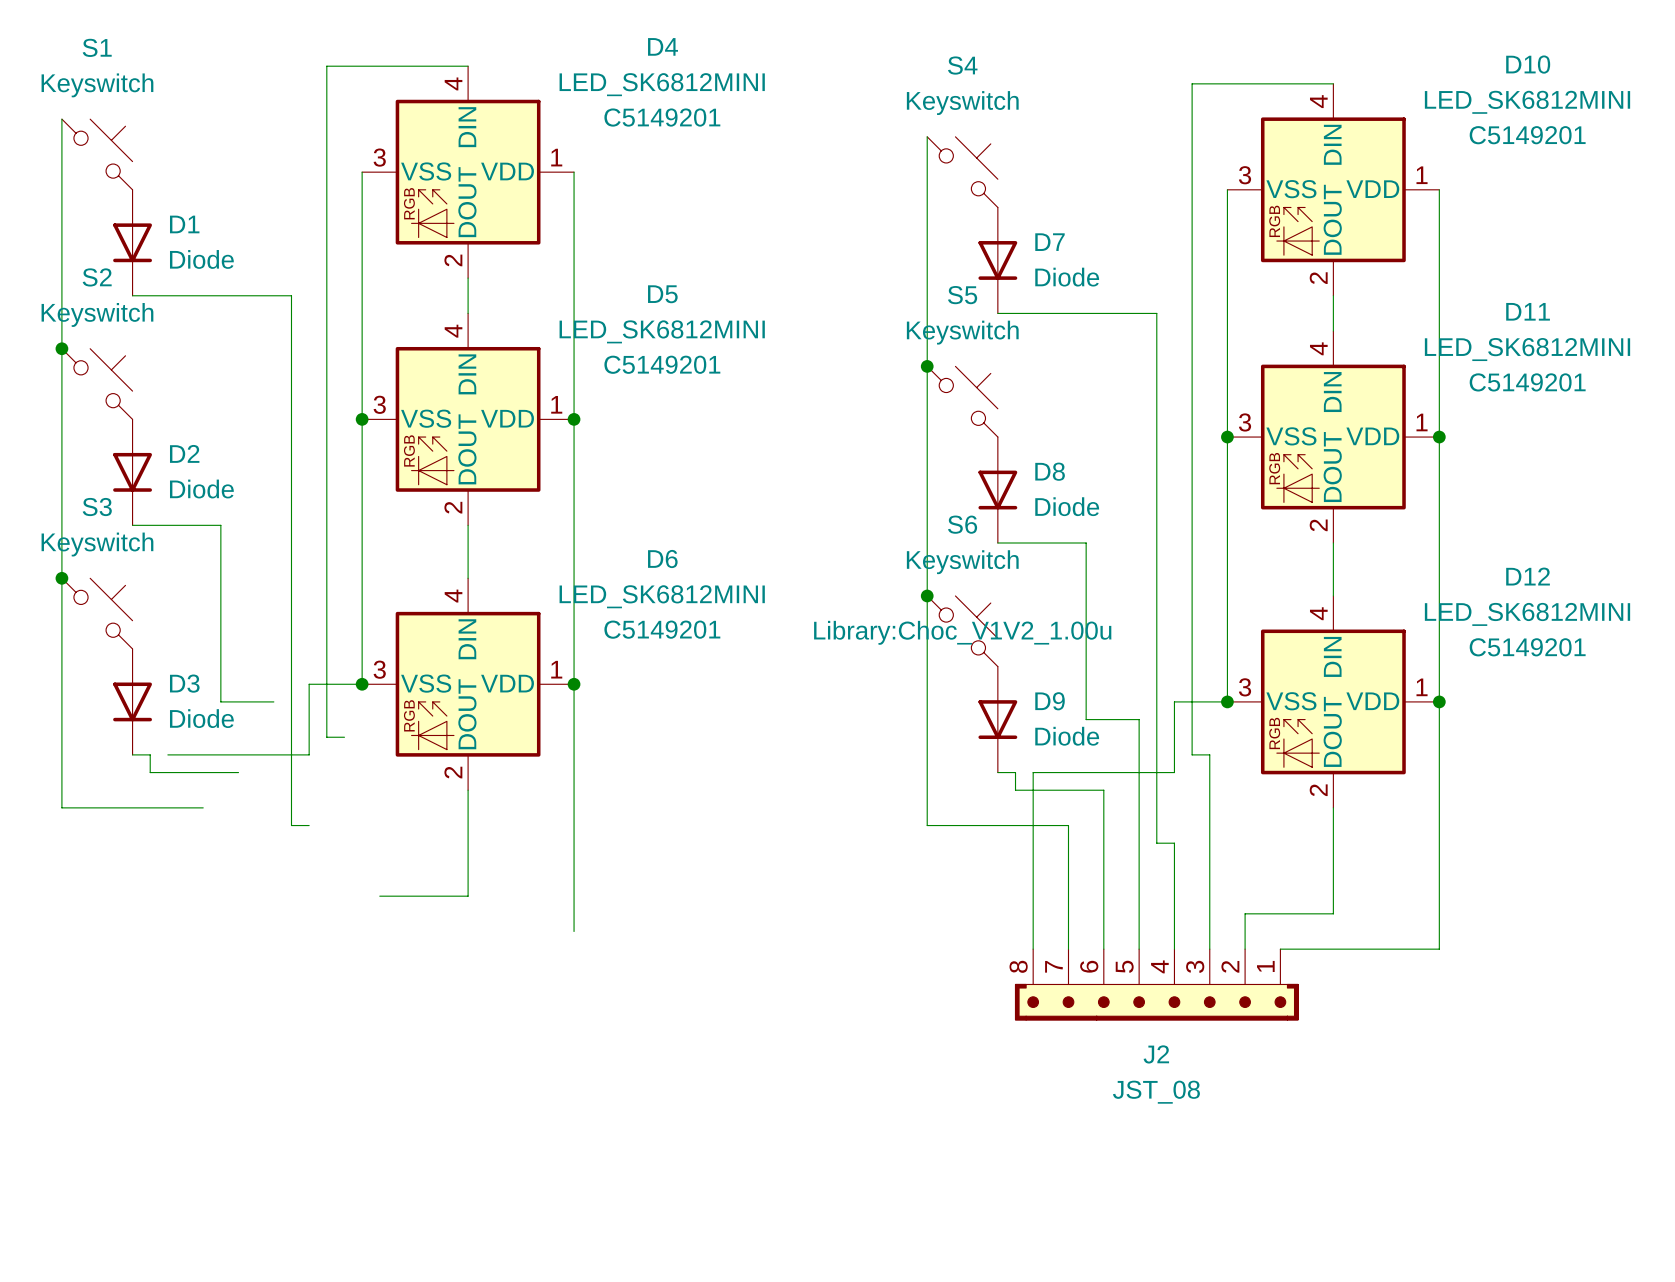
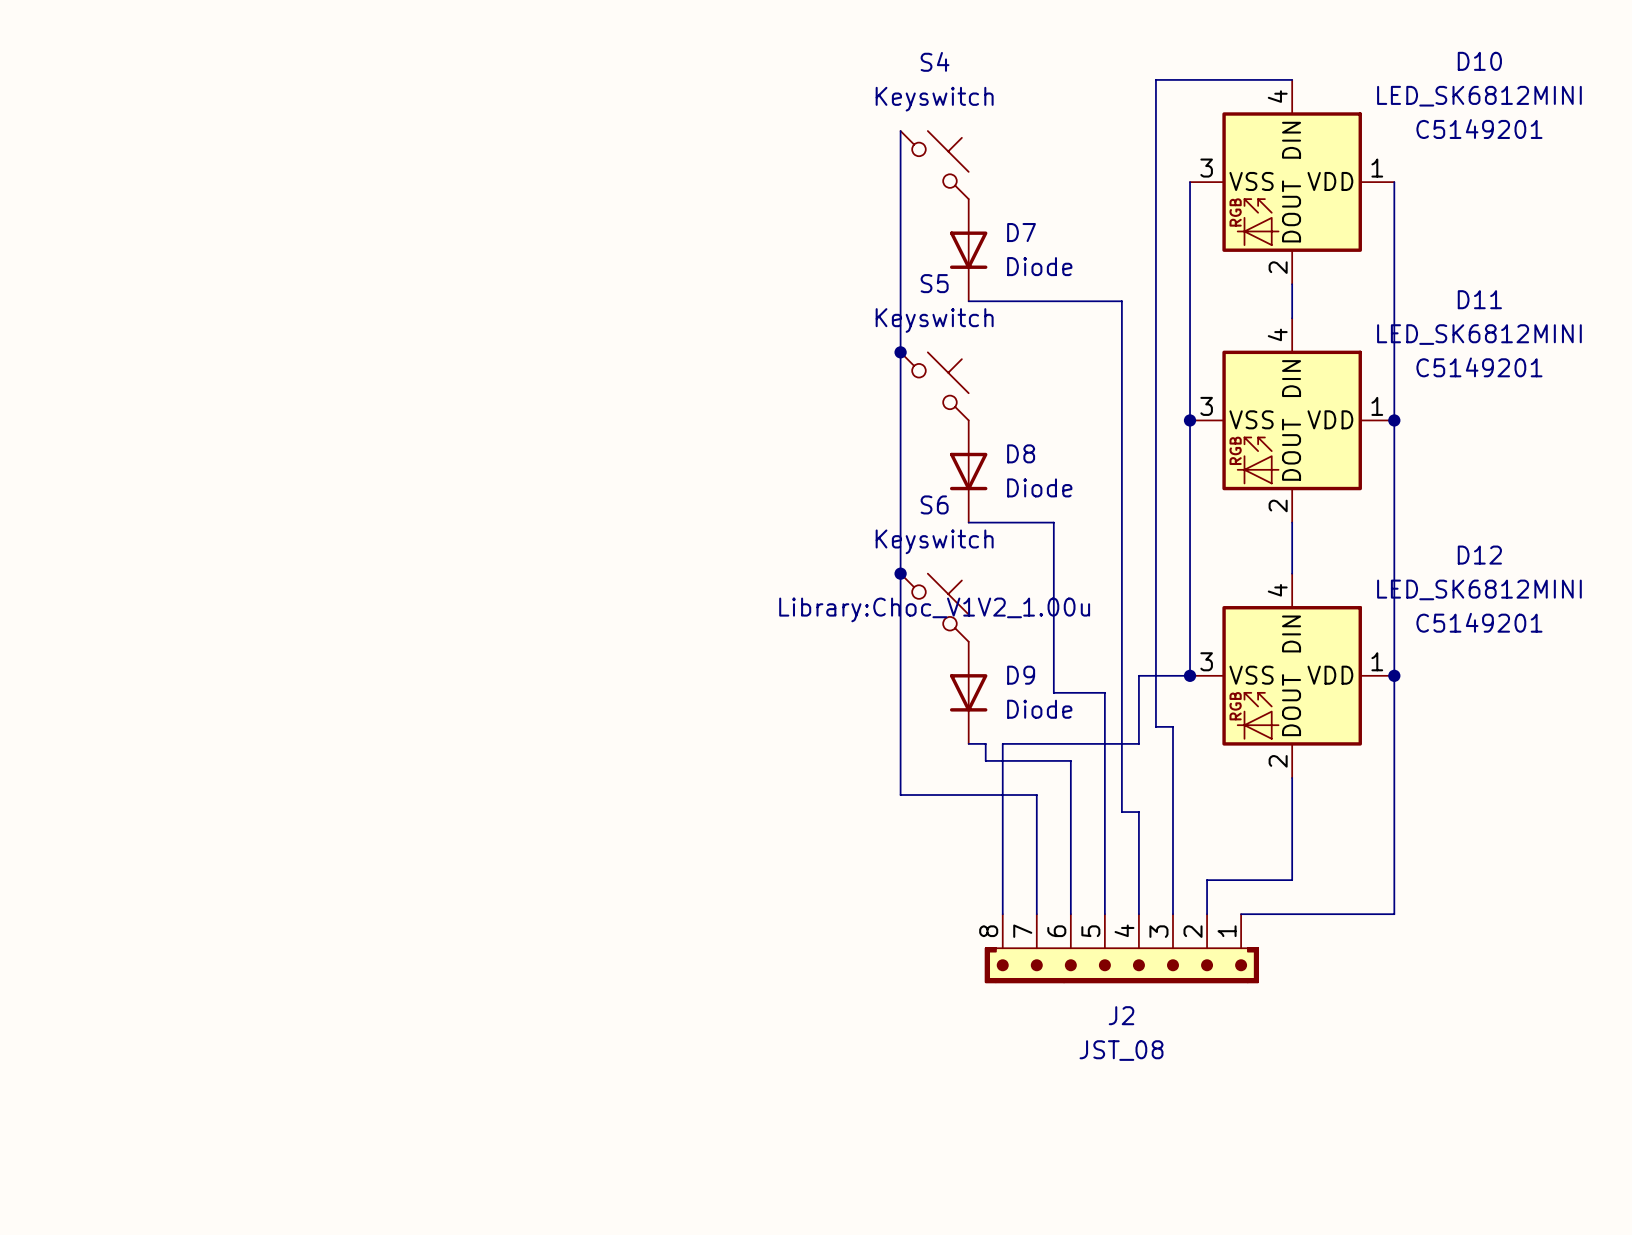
wire: (468, 66) (326, 66) (326, 737) (344, 737) -> none
wire: (61, 119) (61, 807) (203, 807) -> none
S1: Keyswitch (97, 154) -> none
wire: (362, 172) (362, 684) (309, 684) (309, 754) (167, 754) -> none
D4: LED_SK6812MINI (468, 172) -> none
wire: (574, 172) (574, 931) -> none
D1: Diode (132, 242) -> none
wire: (468, 278) (468, 313) -> none
wire: (132, 295) (291, 295) (291, 825) (309, 825) -> none
junction: (61, 348) -> none
S2: Keyswitch (97, 384) -> none
junction: (362, 419) -> none
D5: LED_SK6812MINI (468, 419) -> none
junction: (574, 419) -> none
D2: Diode (132, 472) -> none
wire: (132, 525) (220, 525) (220, 701) (273, 701) -> none
wire: (468, 525) (468, 578) -> none
junction: (61, 578) -> none
S3: Keyswitch (97, 613) -> none
junction: (362, 684) -> none
D6: LED_SK6812MINI (468, 684) -> none
junction: (574, 684) -> none
D3: Diode (132, 701) -> none
wire: (132, 754) (150, 754) (150, 772) (238, 772) -> none
wire: (468, 790) (468, 896) (379, 896) -> none

